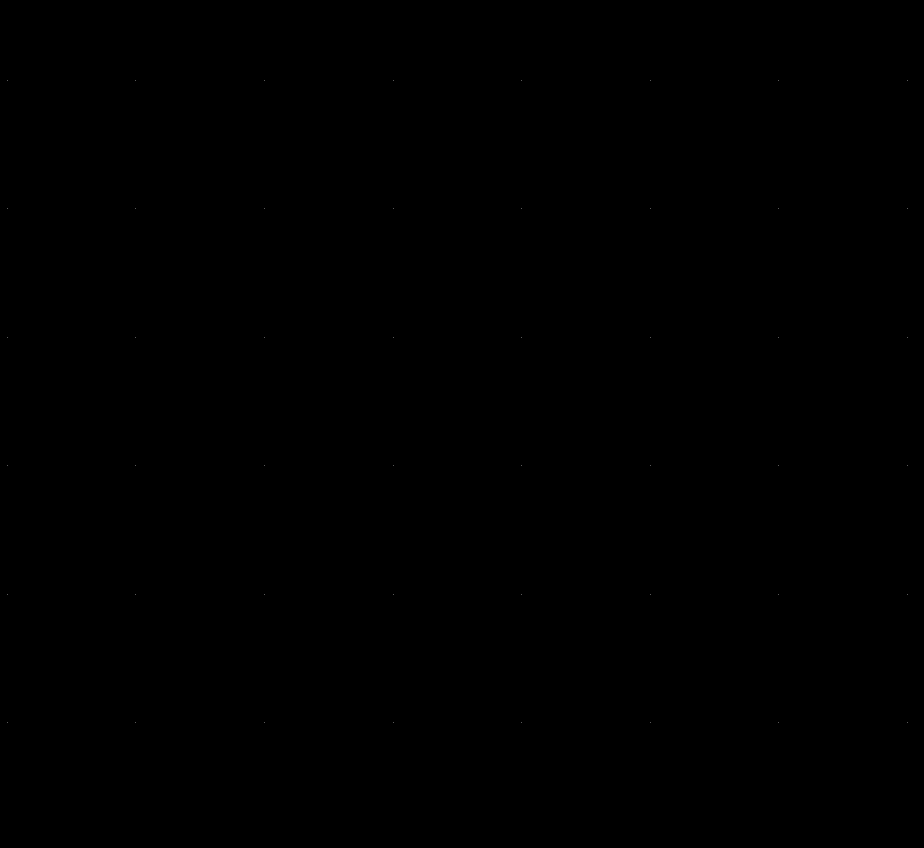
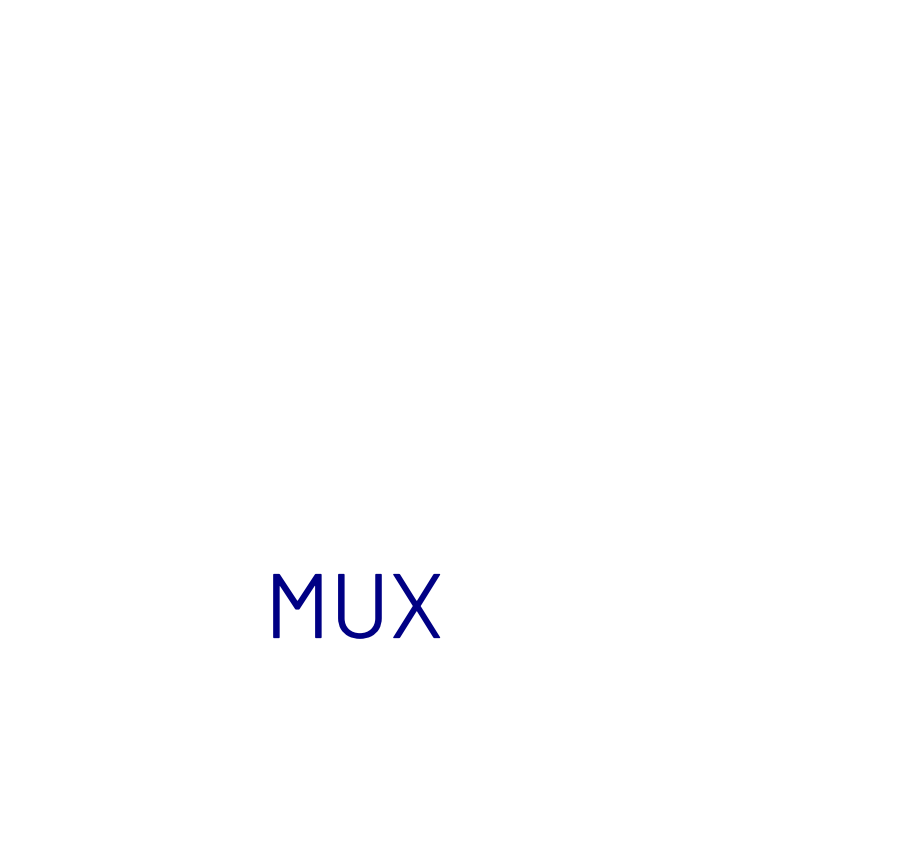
text: none -> MUX (356, 606)

